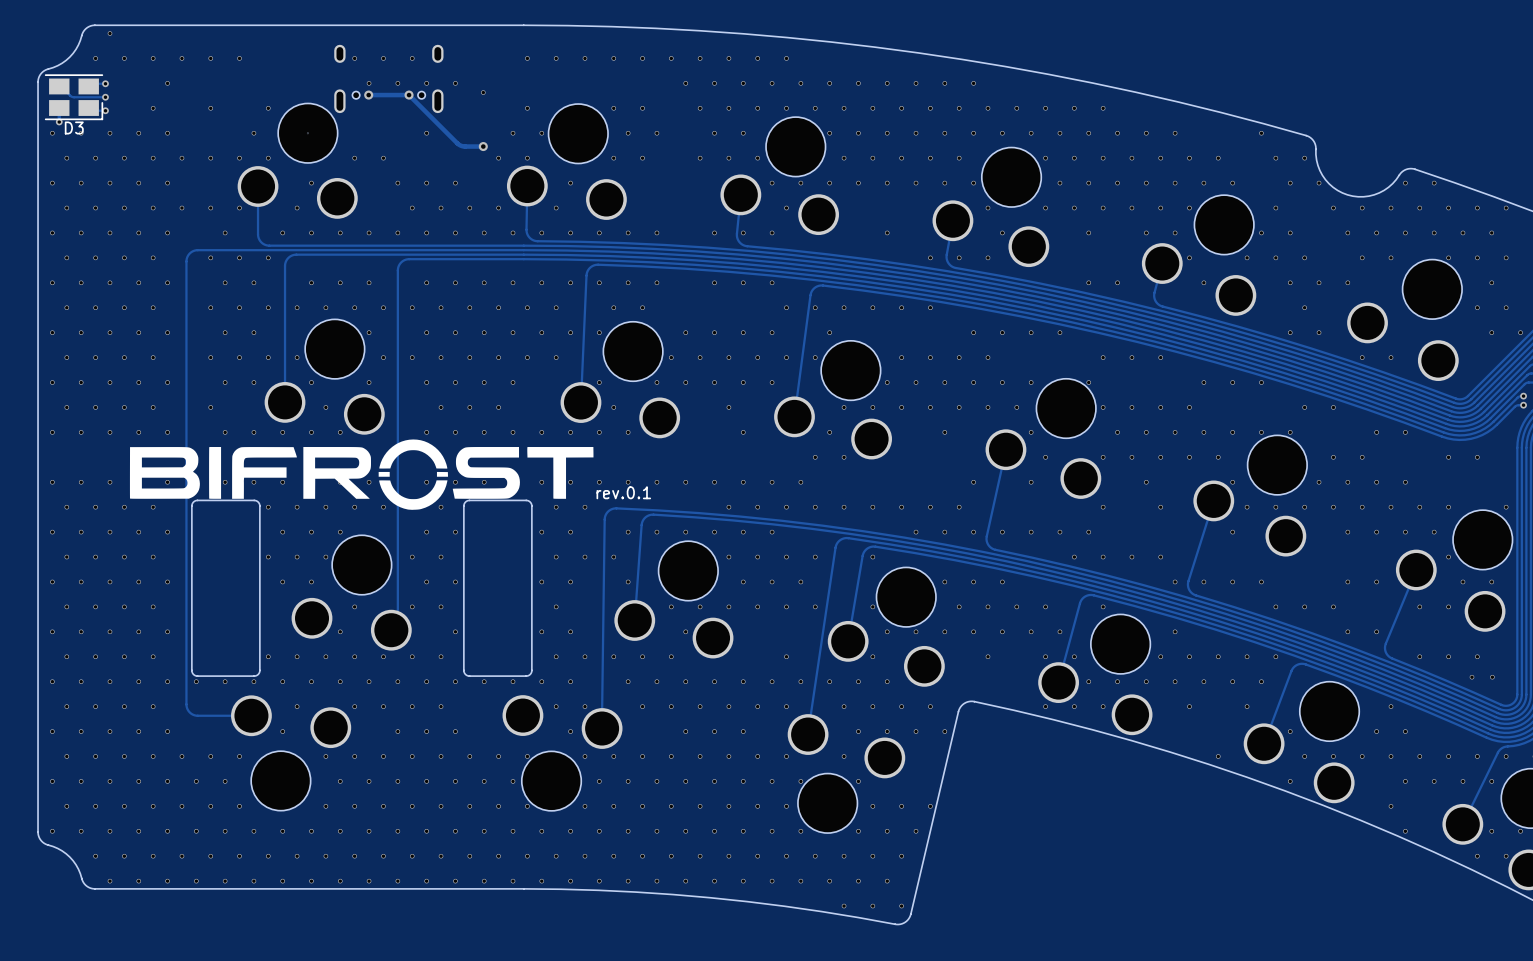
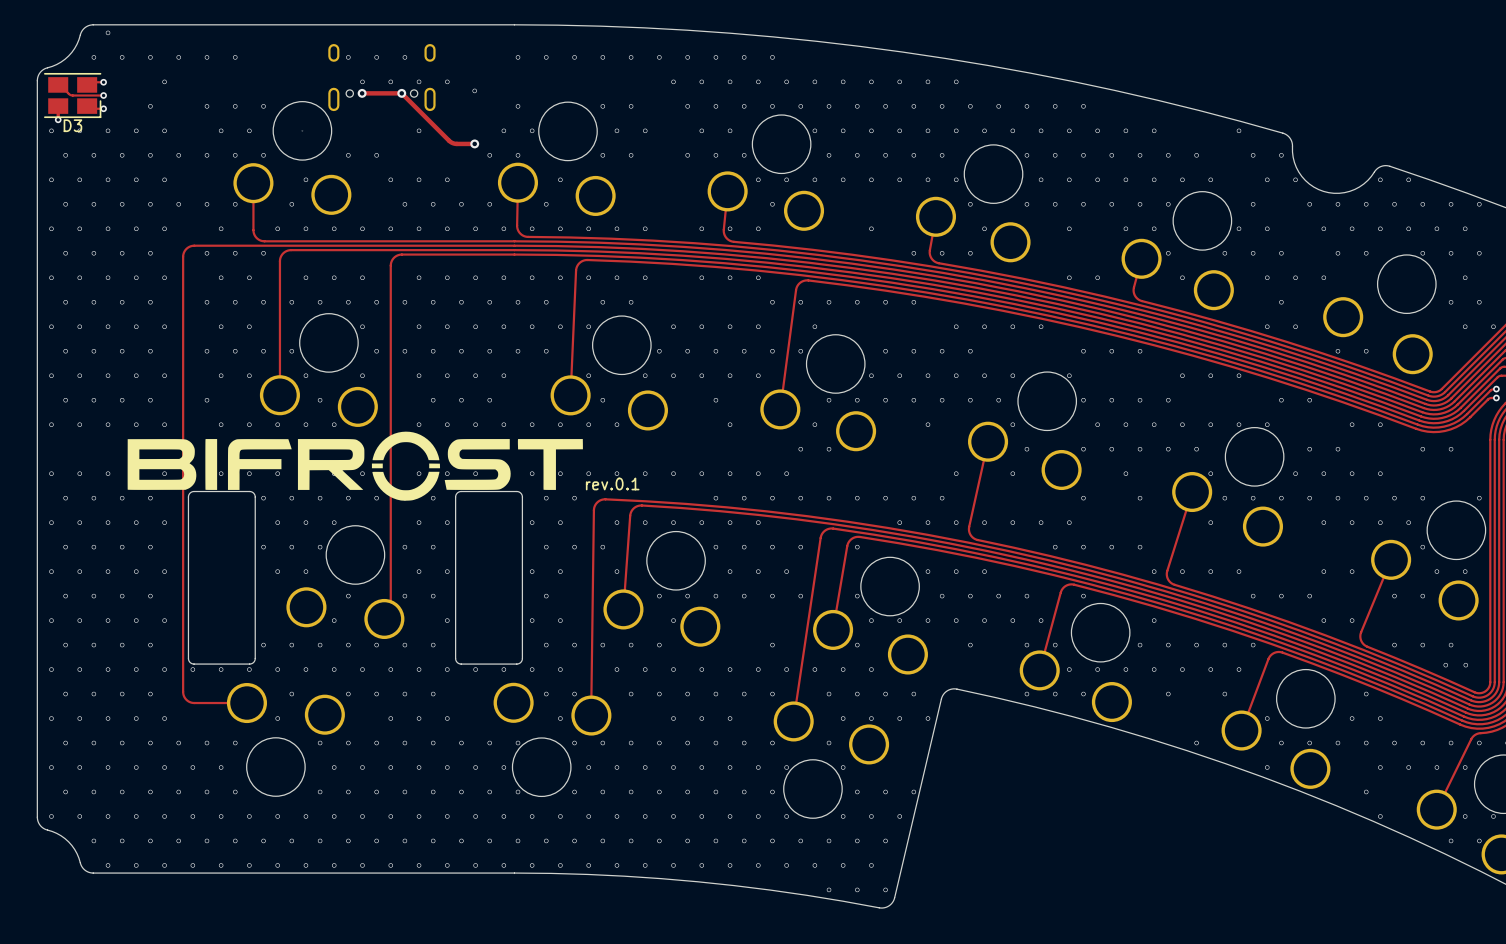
via: none -> (235, 106)
via: none -> (221, 130)

